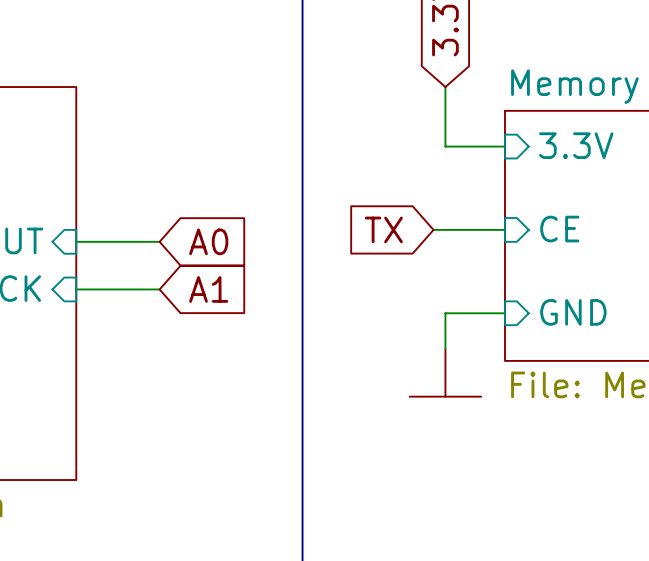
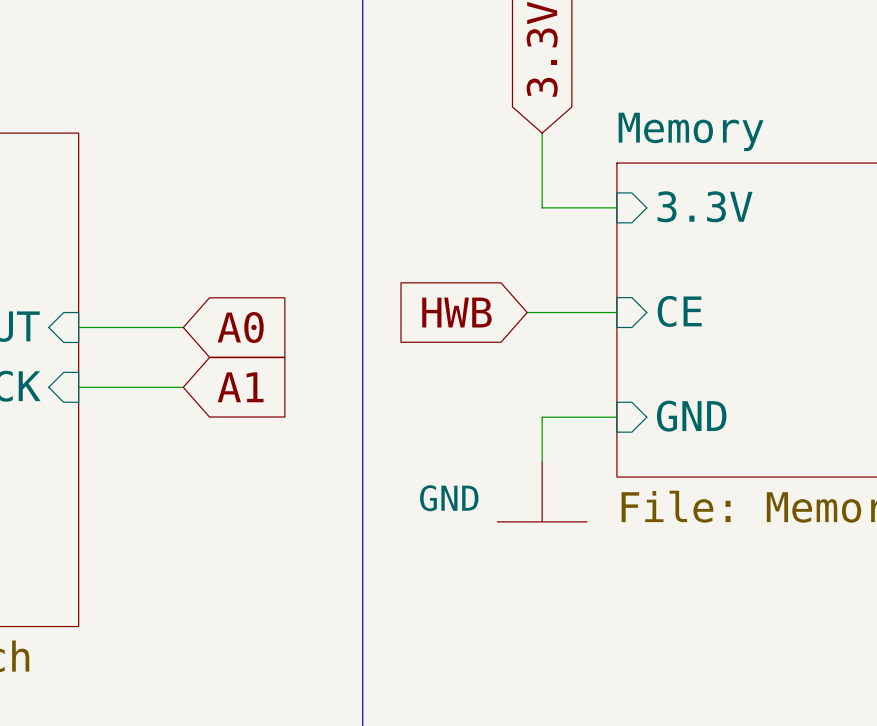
global label: TX (383, 229) -> HWB (456, 312)
power symbol text: none -> GND (449, 498)

